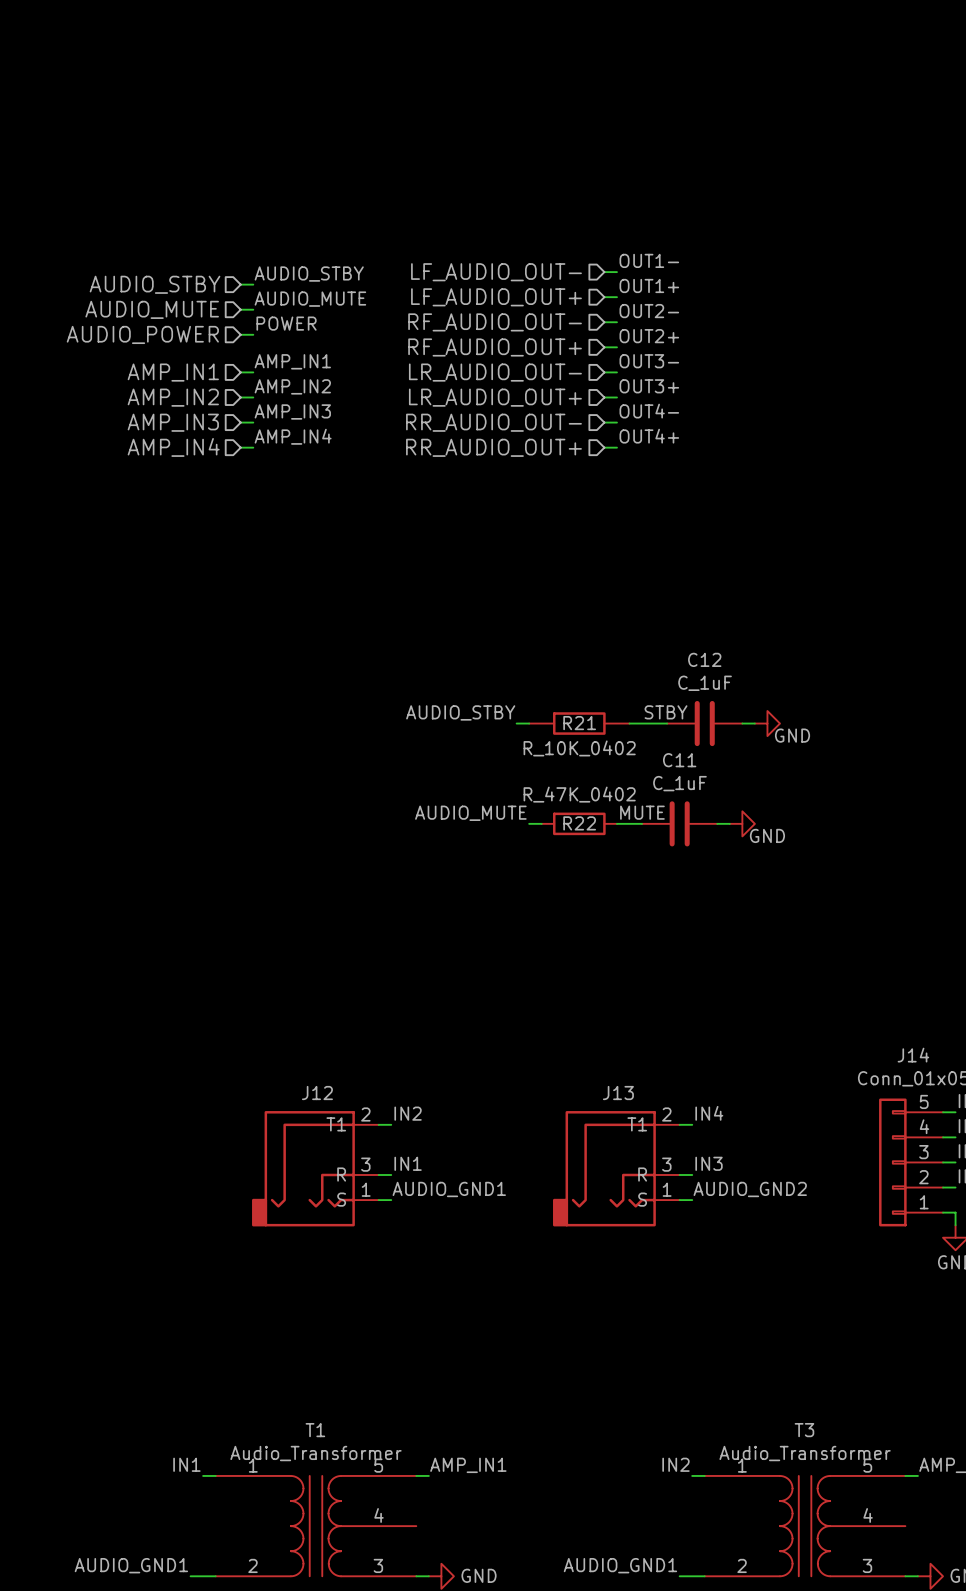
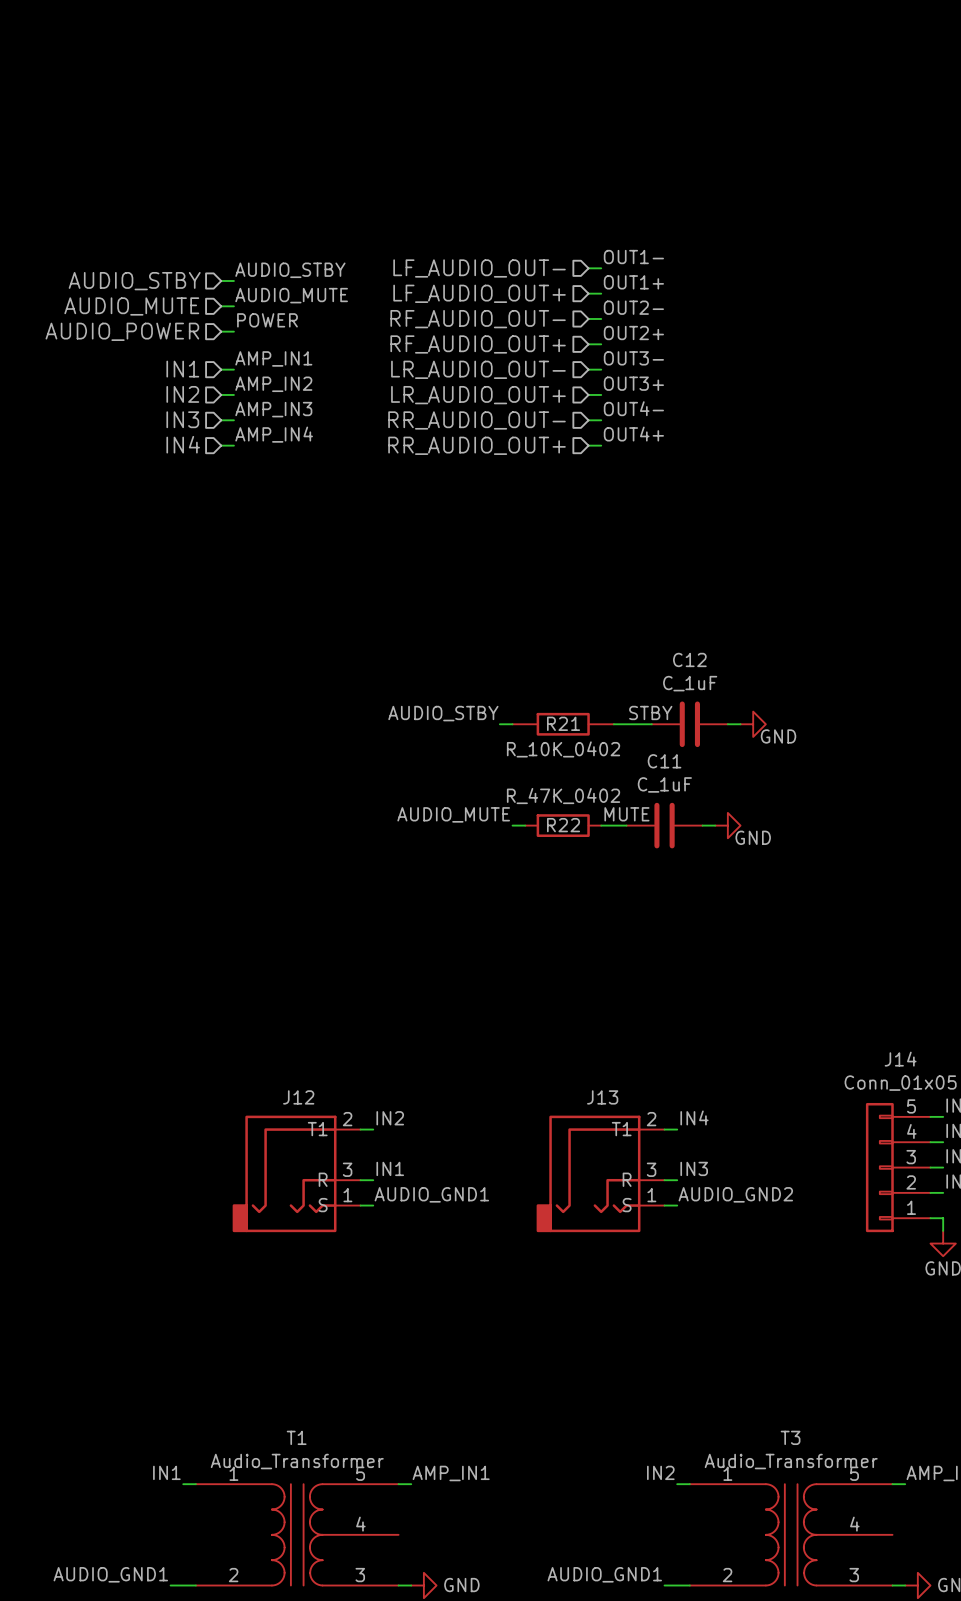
hierarchical label: AMP_IN1 (173, 372) -> IN1 (182, 369)
hierarchical label: AMP_IN2 (173, 397) -> IN2 (182, 394)
hierarchical label: AMP_IN3 (173, 422) -> IN3 (182, 419)
hierarchical label: AMP_IN4 (173, 447) -> IN4 (183, 444)

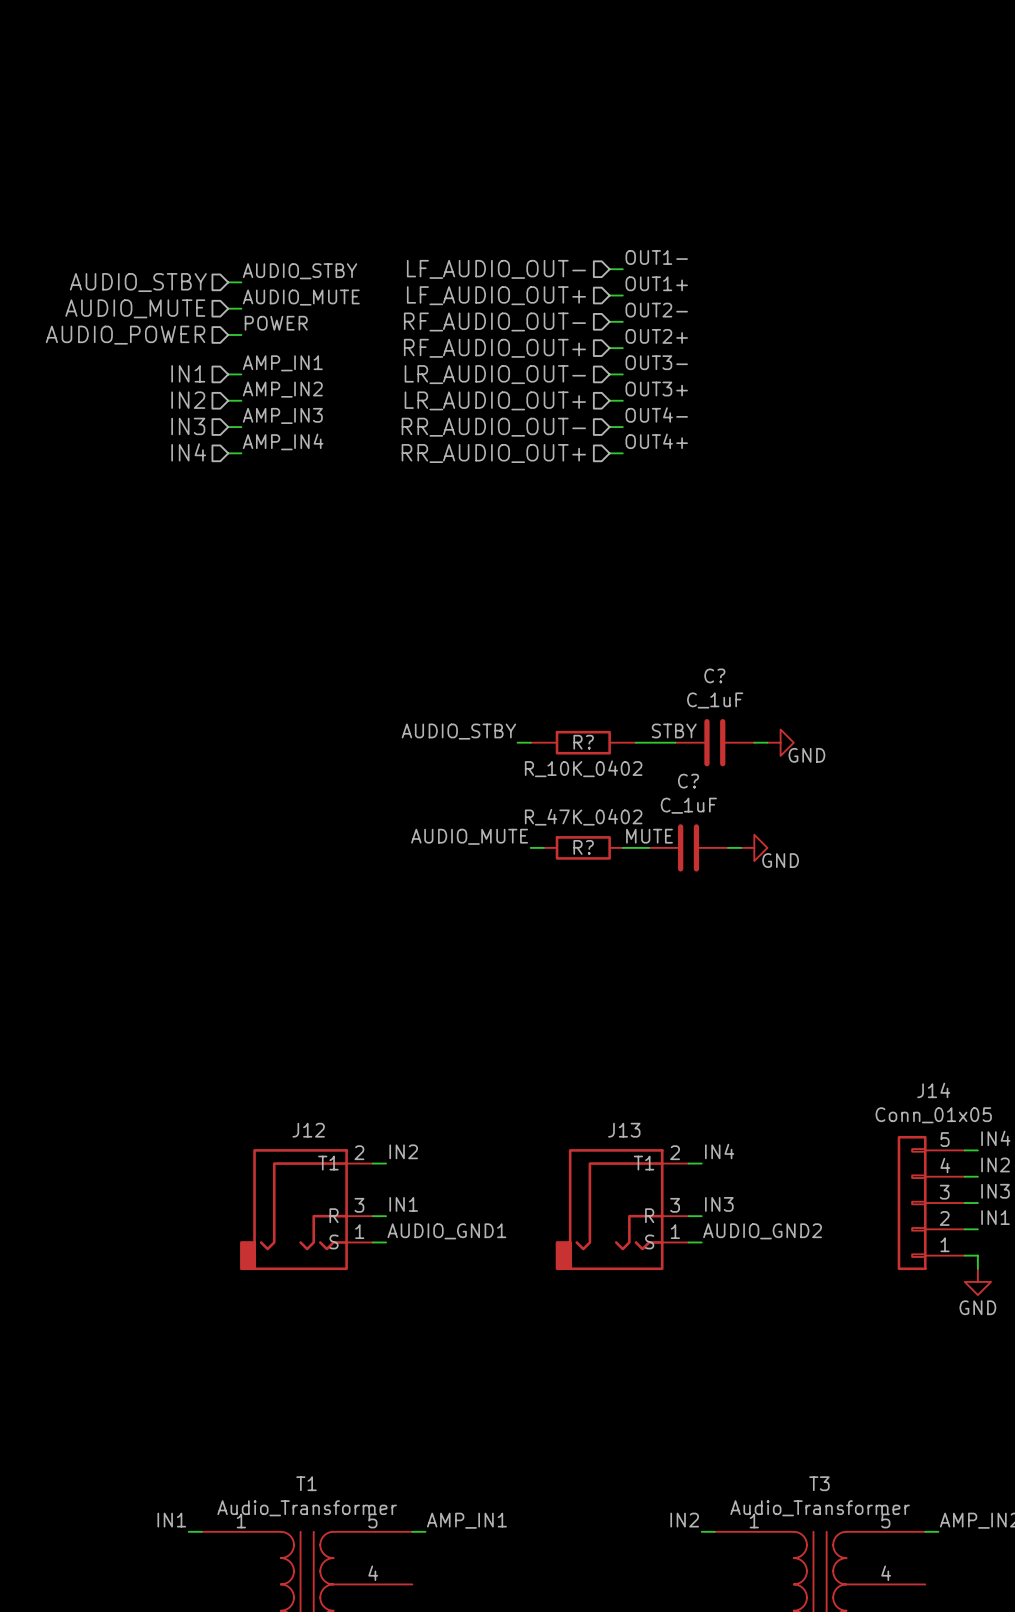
C12 name: C12 (689, 659) -> C? (714, 675)
R21 name: R21 (563, 723) -> R? (583, 742)
C11 name: C11 (664, 761) -> C? (688, 781)
R22 name: R22 (563, 825) -> R? (583, 847)

